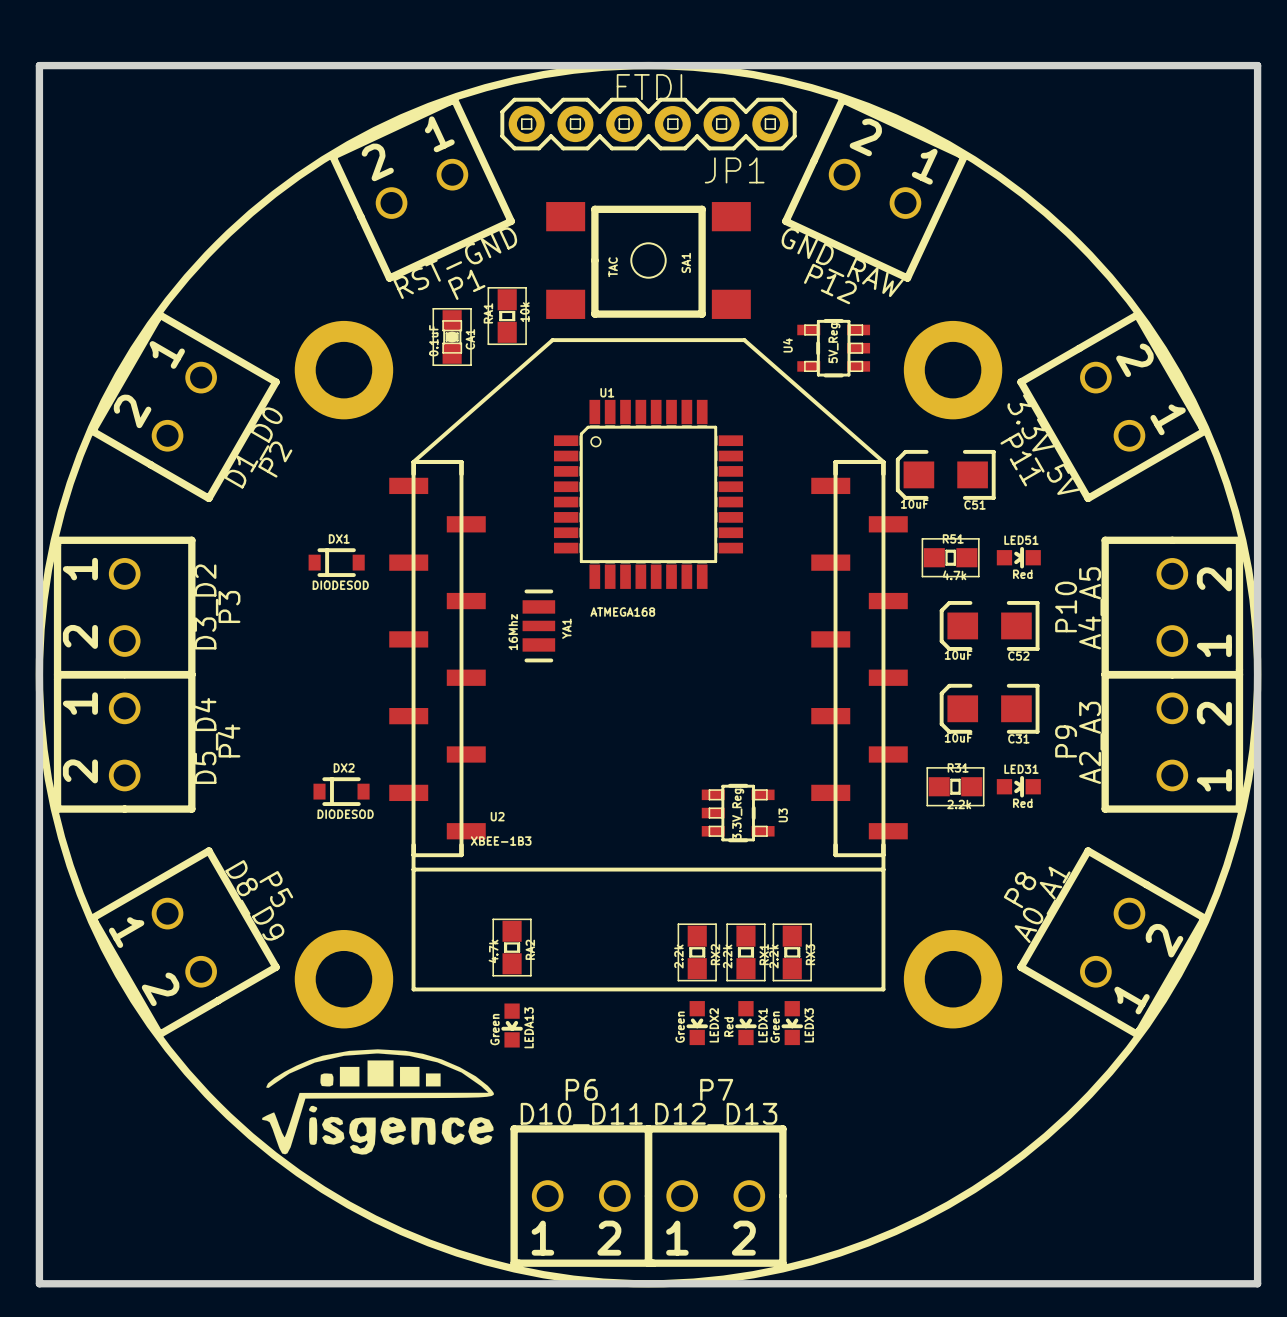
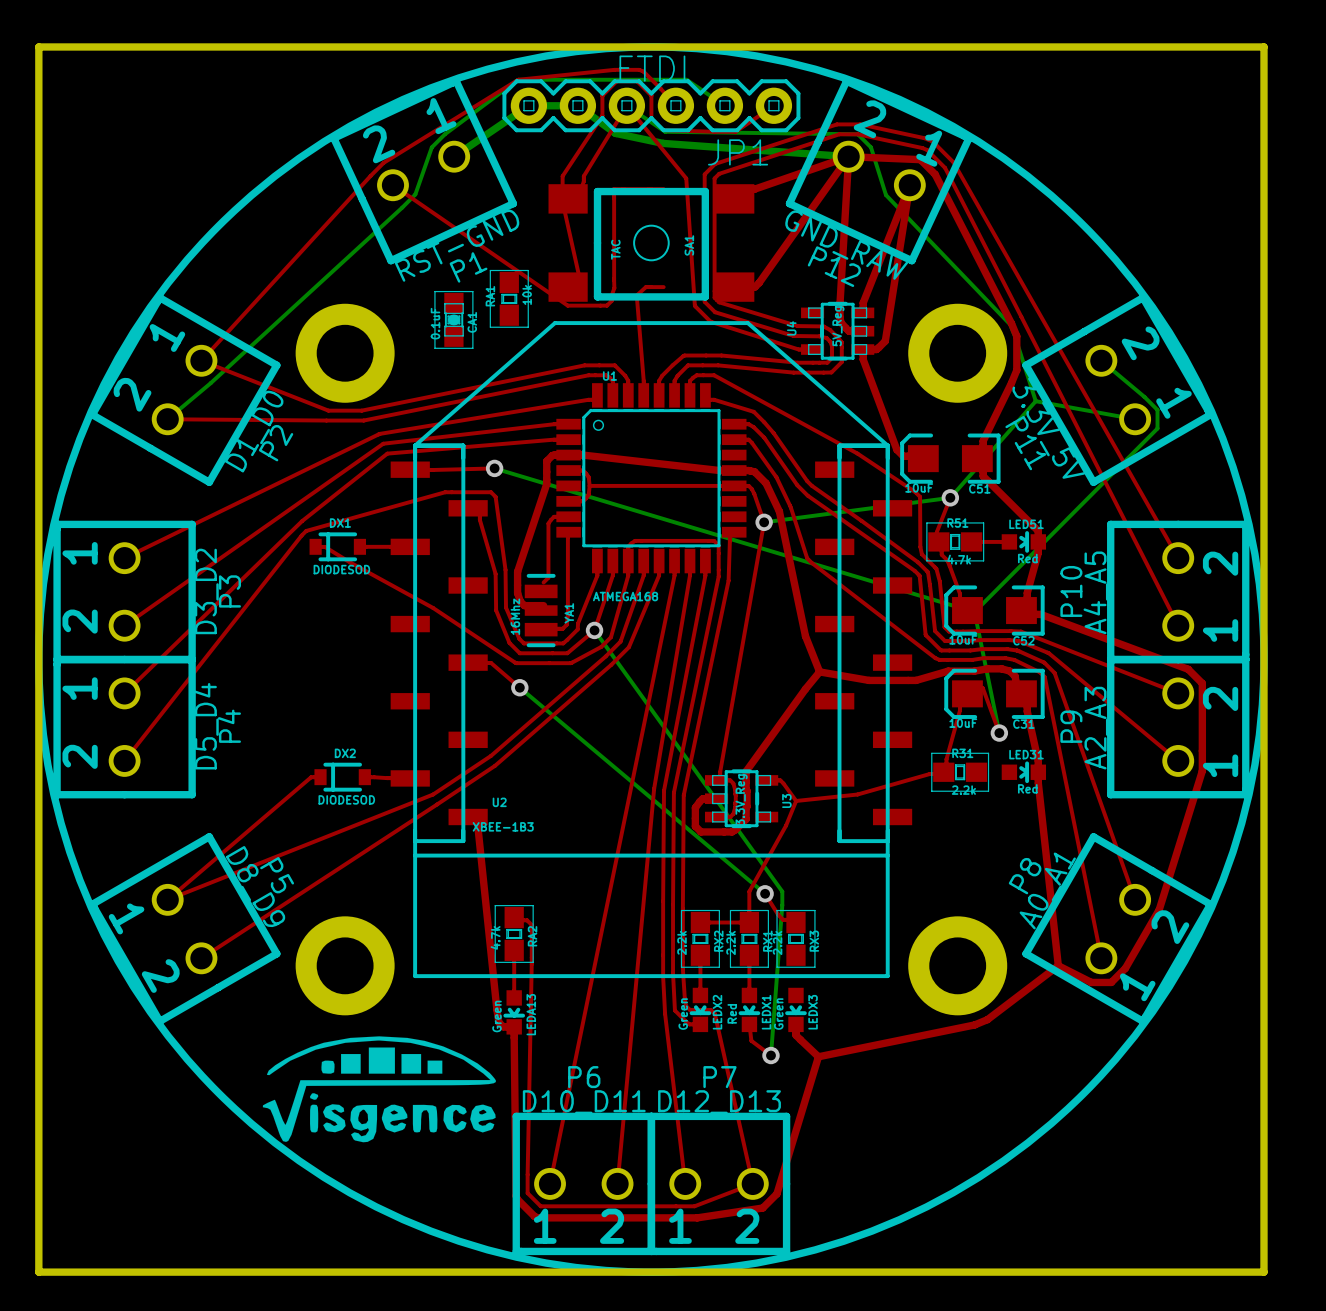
top track: none -> (616, 81) (602, 95) (602, 115)
top track: none -> (637, 81) (651, 95) (651, 115)
bottom track: none -> (626, 105) (665, 131) (857, 134) (871, 147) (886, 195) (1010, 324) (1035, 401)
top track: none -> (675, 105) (643, 71) (639, 69) (614, 69) (517, 80) (383, 162) (201, 360) (328, 410) (361, 410) (584, 365) (614, 365) (628, 380) (628, 395)
bottom track: none -> (724, 105) (686, 79) (517, 80) (444, 134) (431, 147) (415, 194) (210, 383) (167, 419)
top track: none -> (773, 105) (735, 131) (665, 130)
top track: none -> (602, 115) (562, 176) (562, 201) (581, 288)
bottom track: none -> (454, 156) (528, 105) (577, 105) (614, 133) (663, 143) (848, 156)
top track: none -> (848, 156) (920, 159) (935, 174) (1016, 336) (1016, 370) (983, 441) (983, 448) (977, 458) (983, 468) (983, 476) (1038, 531) (1038, 552) (1027, 593) (1027, 600) (1021, 610) (1033, 614) (1040, 614) (1188, 669) (1202, 683) (1202, 770) (1159, 909) (1125, 968) (1111, 982) (1091, 982) (1058, 965)
top track: none -> (848, 156) (840, 317) (840, 322) (848, 331) (862, 331)
top track: none -> (848, 156) (759, 282) (754, 287) (737, 287)
top track: none -> (848, 156) (754, 189) (737, 189)
top track: none -> (393, 185) (567, 305) (607, 305) (611, 300) (614, 288) (613, 189) (663, 189)
top track: none -> (581, 189) (583, 176) (626, 105) (686, 178) (695, 306) (711, 322) (798, 349) (812, 349)
top track: none -> (663, 287) (645, 287) (636, 295) (643, 395)
top track: none -> (862, 312) (863, 302) (909, 185) (885, 341) (876, 349) (862, 349) (863, 359) (896, 449) (903, 456) (923, 458)
bottom track: none -> (1101, 360) (1157, 409) (1157, 428) (974, 612)
top track: none -> (597, 395) (593, 399) (379, 433) (124, 558)
top track: none -> (612, 395) (612, 380) (609, 377) (606, 375) (588, 375) (363, 420) (167, 419)
top track: none -> (659, 395) (659, 380) (662, 375) (684, 355) (721, 355) (797, 362) (827, 362) (832, 358) (832, 346) (826, 338) (793, 335) (715, 312) (704, 301) (704, 174) (715, 163) (837, 124) (860, 124) (924, 138) (932, 141) (953, 162) (1178, 558)
top track: none -> (674, 395) (674, 380) (688, 365) (718, 365) (793, 372) (831, 372) (841, 362) (841, 342) (830, 329) (823, 326) (797, 326) (719, 302) (714, 297) (714, 178) (719, 173) (839, 134) (857, 134) (927, 150) (945, 167) (1178, 625)
top track: none -> (689, 395) (689, 380) (693, 377) (696, 375) (714, 375) (857, 453) (915, 492) (920, 496) (921, 554) (936, 568) (939, 581) (944, 627) (948, 631) (1020, 631) (1178, 693)
top track: none -> (705, 395) (708, 399) (753, 411) (773, 433) (811, 485) (918, 562) (928, 572) (935, 631) (945, 641) (1019, 641) (1048, 653) (1178, 760)
bottom track: none -> (1035, 401) (1135, 419)
bottom track: none -> (1035, 401) (950, 497) (764, 522)
top track: none -> (568, 424) (554, 424) (383, 443) (124, 625)
top track: none -> (734, 424) (748, 424) (753, 427) (764, 437) (797, 485) (807, 495) (919, 575) (925, 634) (940, 650) (1017, 650) (1044, 662) (1054, 672) (1135, 899)
top track: none -> (568, 439) (387, 453) (302, 521) (124, 693)
top track: none -> (734, 439) (748, 439) (776, 477) (790, 507) (807, 558) (935, 658) (939, 659) (972, 659) (1005, 658) (1014, 659) (1040, 672) (1044, 677) (1101, 958)
bottom track: none -> (494, 468) (974, 612)
top track: none -> (494, 468) (410, 469)
via: none -> (494, 468)
top track: none -> (568, 470) (583, 470) (588, 477) (589, 485)
top track: none -> (589, 485) (588, 494) (583, 501) (568, 501)
top track: none -> (589, 485) (748, 485) (754, 494) (764, 522) (720, 777) (716, 780) (730, 780) (733, 783) (735, 807) (730, 817) (716, 817)
top track: none -> (950, 497) (936, 534) (941, 554) (947, 561) (959, 593) (959, 598) (967, 610)
via: none -> (950, 497)
top track: none -> (468, 508) (479, 514) (495, 574) (496, 610) (509, 642) (519, 653) (567, 653) (594, 630) (612, 575) (612, 561)
top track: none -> (568, 516) (554, 516) (548, 523) (548, 577) (543, 582)
via: none -> (764, 522)
top track: none -> (568, 532) (566, 624) (562, 628) (543, 628)
top track: none -> (734, 532) (729, 535) (728, 580) (683, 795) (682, 969) (685, 1005) (689, 1009) (710, 1009) (714, 1013) (752, 1183) (694, 1206) (540, 1206) (527, 1193) (531, 924) (527, 920) (514, 917)
top track: none -> (971, 541) (1009, 541)
top track: none -> (315, 546) (324, 546) (433, 607) (515, 662) (570, 663) (601, 646) (610, 637) (628, 575) (628, 546) (631, 543) (635, 540) (714, 540) (718, 545) (718, 576) (673, 792) (673, 973) (674, 1010) (689, 1024) (700, 1024)
top track: none -> (359, 546) (410, 546)
top track: none -> (597, 561) (597, 575) (578, 623) (577, 629) (563, 643) (523, 643) (519, 638) (506, 607) (505, 569) (495, 496) (491, 492) (445, 492) (306, 530) (124, 760)
top track: none -> (643, 561) (643, 575) (620, 641) (491, 755) (433, 794) (167, 899) (311, 777) (320, 777)
top track: none -> (659, 561) (659, 575) (628, 647) (611, 664) (495, 765) (201, 958)
top track: none -> (674, 561) (674, 575) (550, 1183)
top track: none -> (689, 561) (689, 575) (654, 788) (617, 1183)
top track: none -> (705, 561) (705, 575) (664, 790) (663, 976) (665, 1013) (685, 1183)
top track: none -> (543, 605) (524, 605) (520, 601) (517, 593) (517, 571) (546, 483) (546, 461) (552, 455) (583, 455) (719, 470) (754, 471) (765, 483) (779, 511) (805, 636) (819, 671)
bottom track: none -> (974, 612) (999, 733)
bottom track: none -> (594, 630) (782, 891) (770, 1055)
via: none -> (594, 630)
top track: none -> (468, 662) (491, 662) (519, 687)
top track: none -> (819, 671) (869, 680) (916, 680) (948, 671) (1001, 668) (1009, 671) (1015, 676) (1015, 684) (1027, 703) (1038, 761) (1038, 783) (1058, 965)
top track: none -> (819, 671) (746, 771) (746, 819) (732, 831) (701, 831) (695, 826) (695, 807) (699, 801) (702, 798) (716, 798)
bottom track: none -> (519, 687) (765, 893)
via: none -> (519, 687)
top track: none -> (999, 733) (982, 688) (980, 688) (967, 693) (959, 705) (943, 772) (929, 773) (857, 794) (796, 800)
via: none -> (999, 733)
top track: none -> (364, 777) (410, 778)
top track: none -> (766, 780) (780, 780) (796, 800)
top track: none -> (796, 800) (786, 825) (749, 891) (749, 922) (700, 922)
top track: none -> (468, 817) (478, 821) (498, 1022) (503, 1026) (514, 1026) (516, 1195) (534, 1216) (697, 1217) (762, 1208) (776, 1193) (818, 1056)
top track: none -> (765, 893) (783, 919) (795, 922)
via: none -> (765, 893)
top track: none -> (514, 950) (514, 997)
top track: none -> (700, 955) (700, 995)
top track: none -> (749, 955) (749, 995)
top track: none -> (1058, 965) (987, 1019) (974, 1024) (818, 1056)
top track: none -> (749, 1024) (755, 1024) (749, 1024) (751, 1040) (770, 1055)
top track: none -> (795, 1024) (795, 1035) (818, 1056)
via: none -> (770, 1055)

